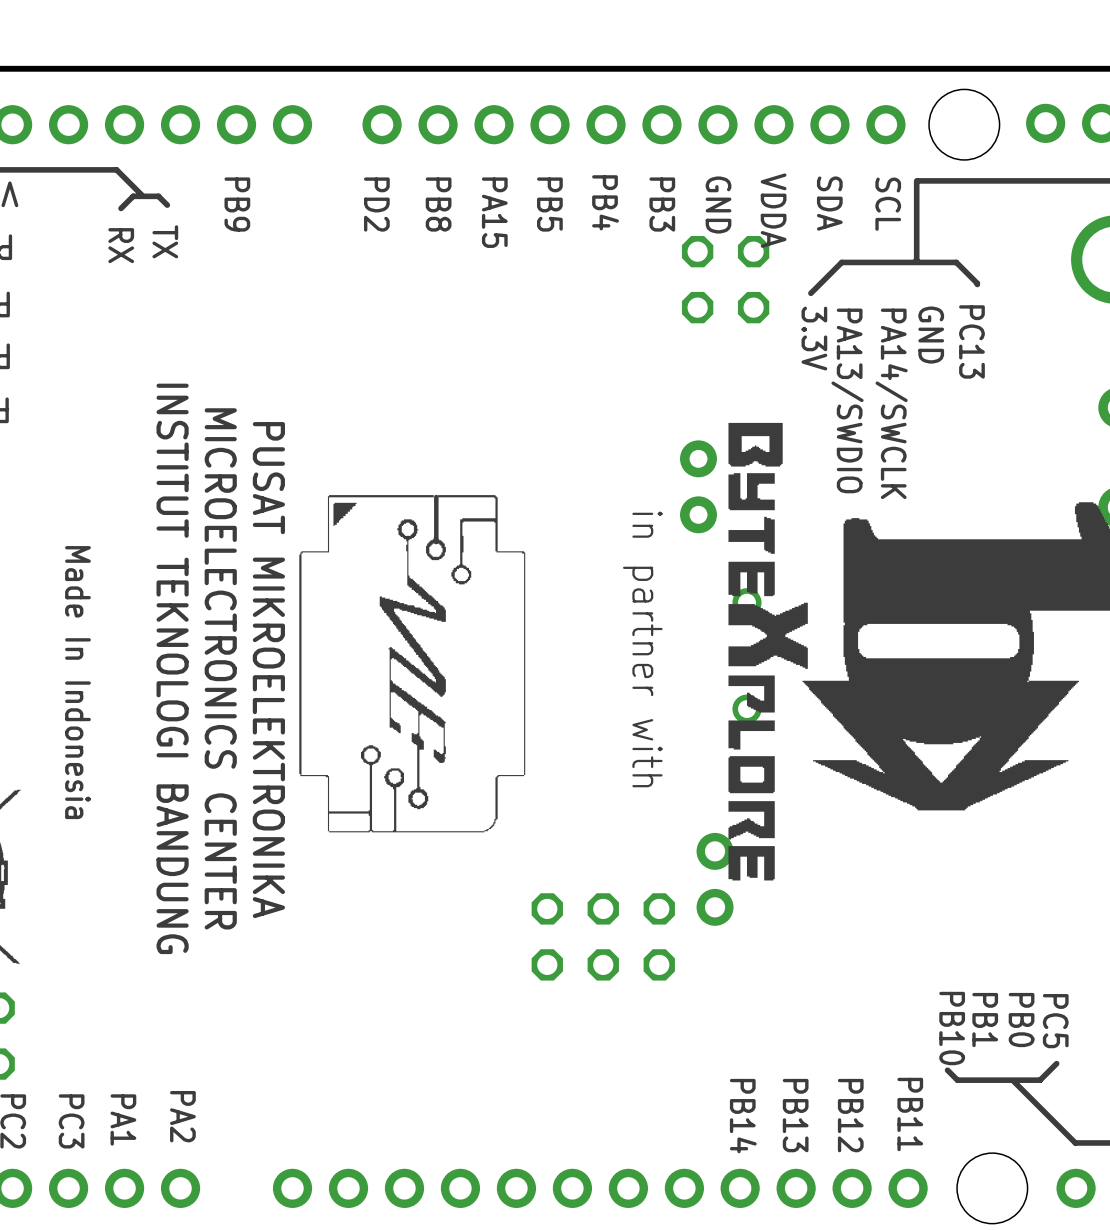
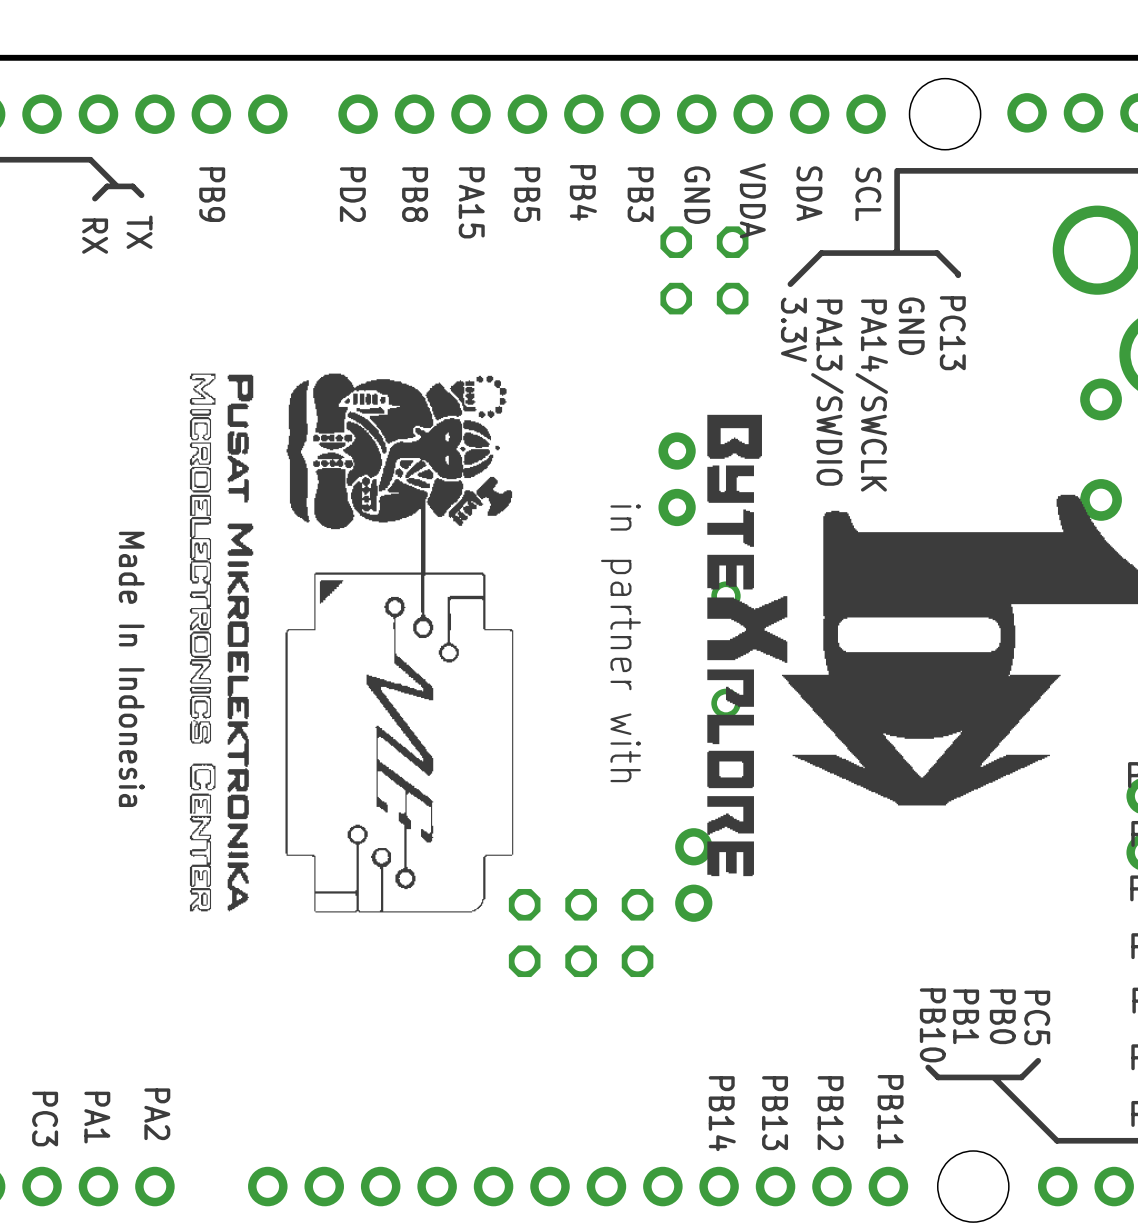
drawing: none -> [189, 373, 254, 912]
drawing: none -> [285, 373, 514, 913]
drawing: [299, 494, 526, 833] -> none
text: none -> Made In Indonesia (131, 669)

